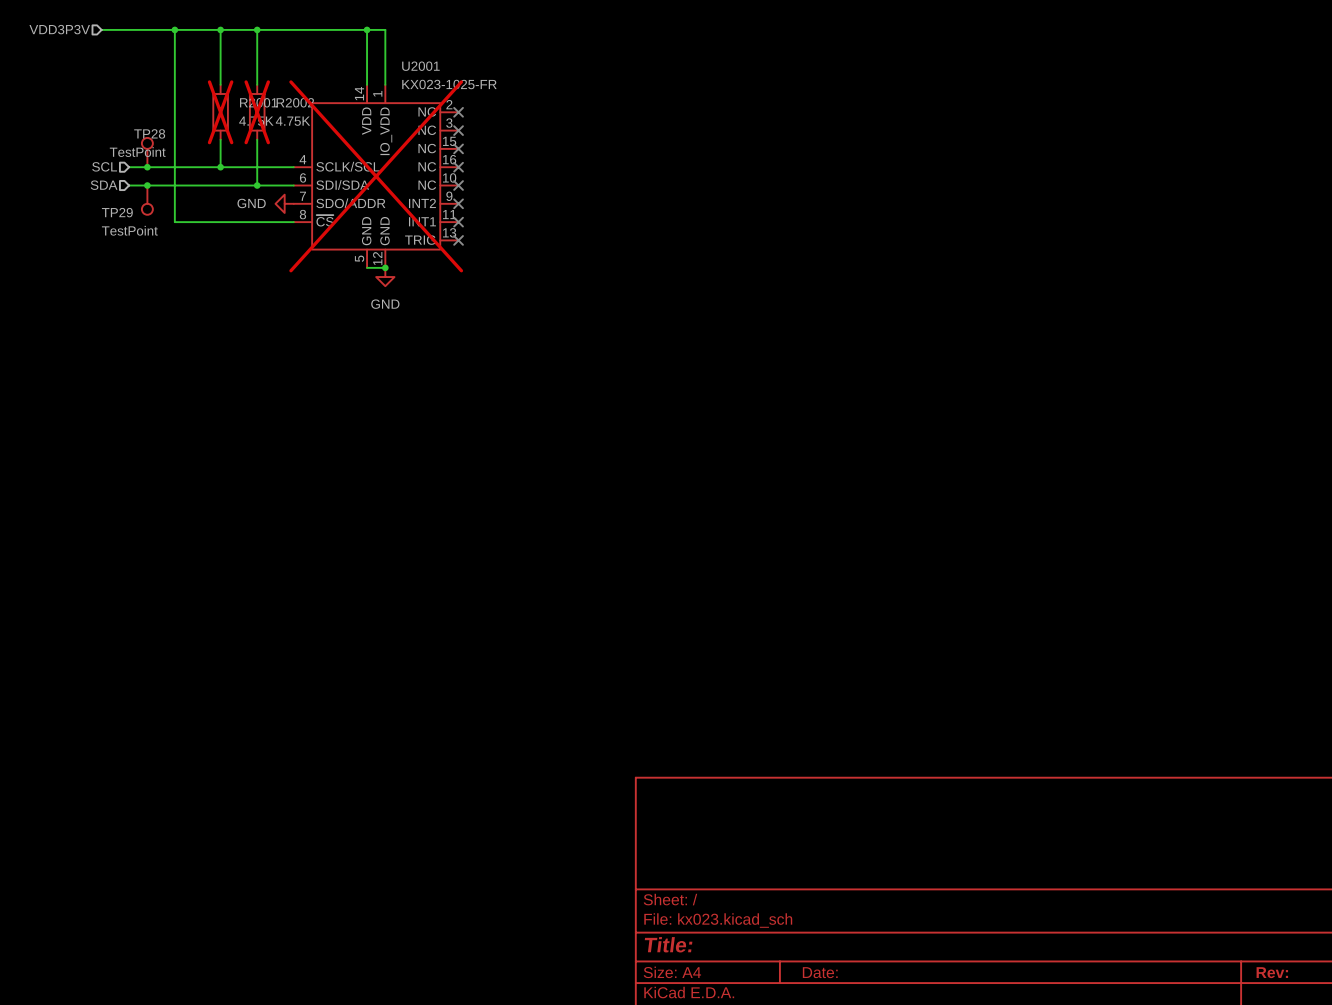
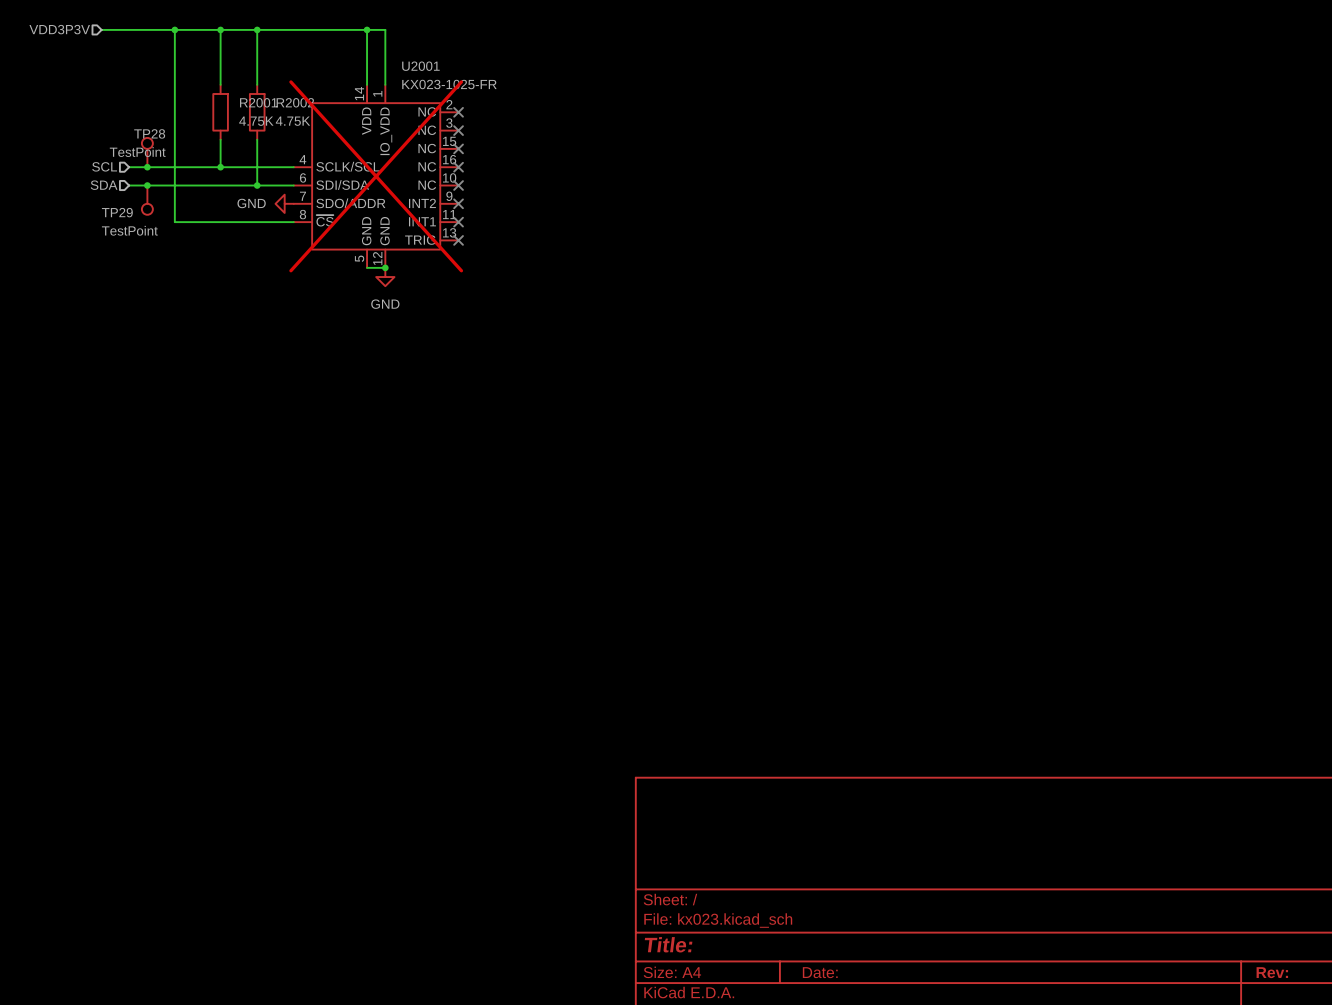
R2001 do-not-place cross: (220, 112) -> none
R2002 do-not-place cross: (257, 112) -> none

